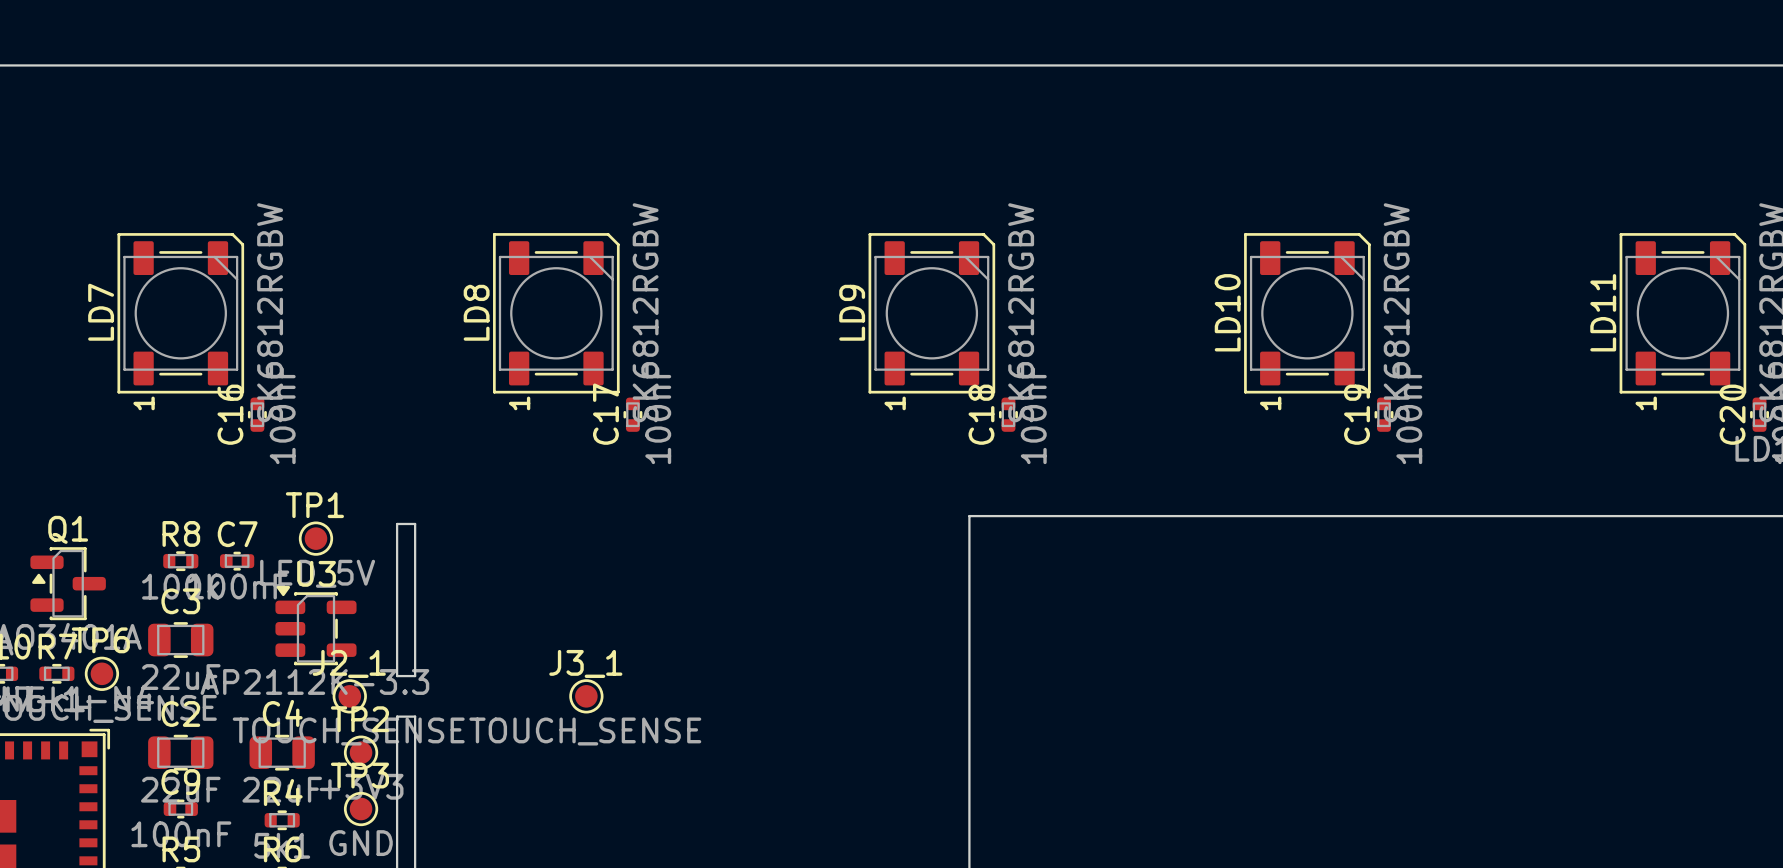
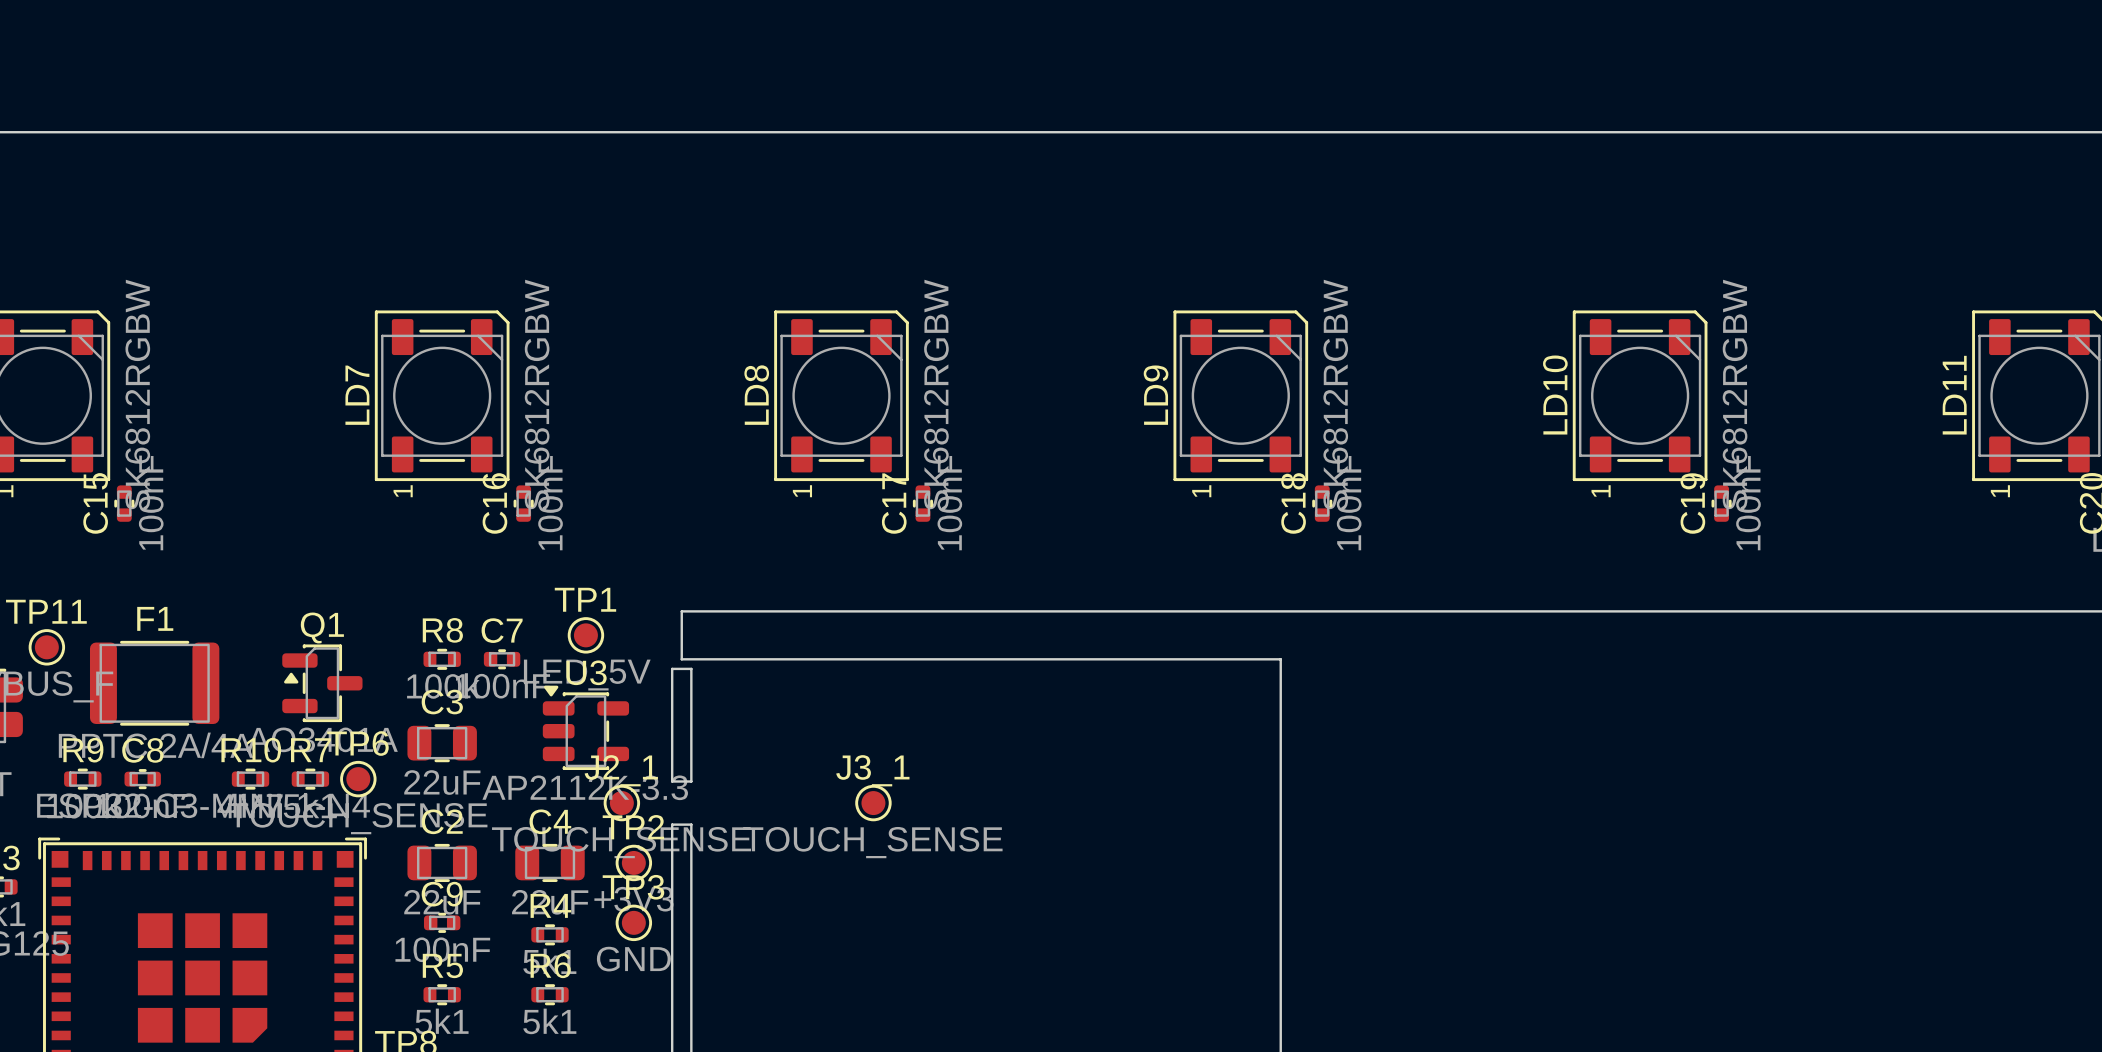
board edge: (969, 516) (969, 561) -> (1280, 611) (681, 611) (681, 659) (1280, 659)
board edge: (397, 570) (397, 523) (415, 523) (415, 570) -> (672, 668) (691, 668)

